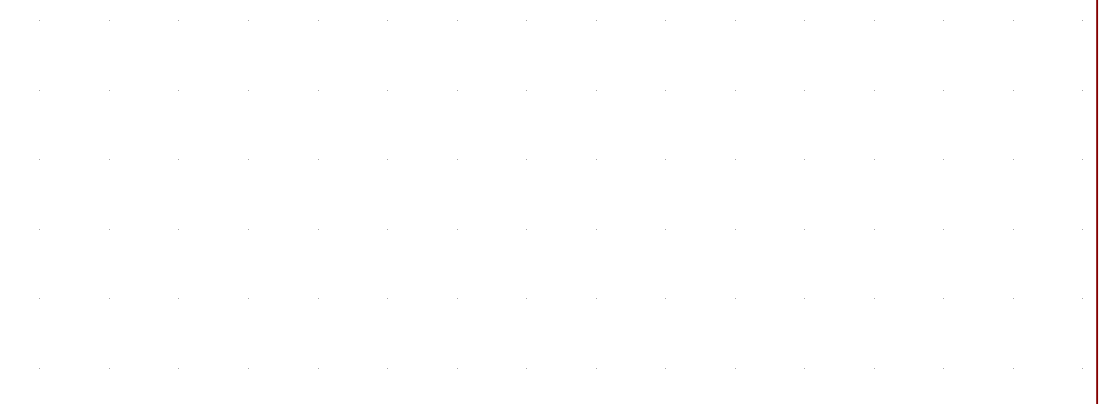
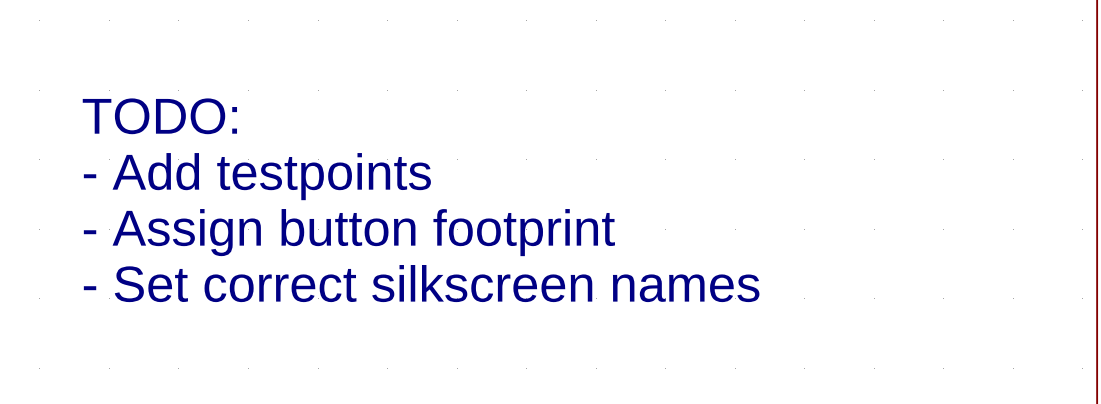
text: none -> TODO: (159, 116)
text: none -> - Add testpoints (257, 176)
text: none -> - Assign button footprint (349, 232)
text: none -> - Set correct silkscreen names (421, 283)

